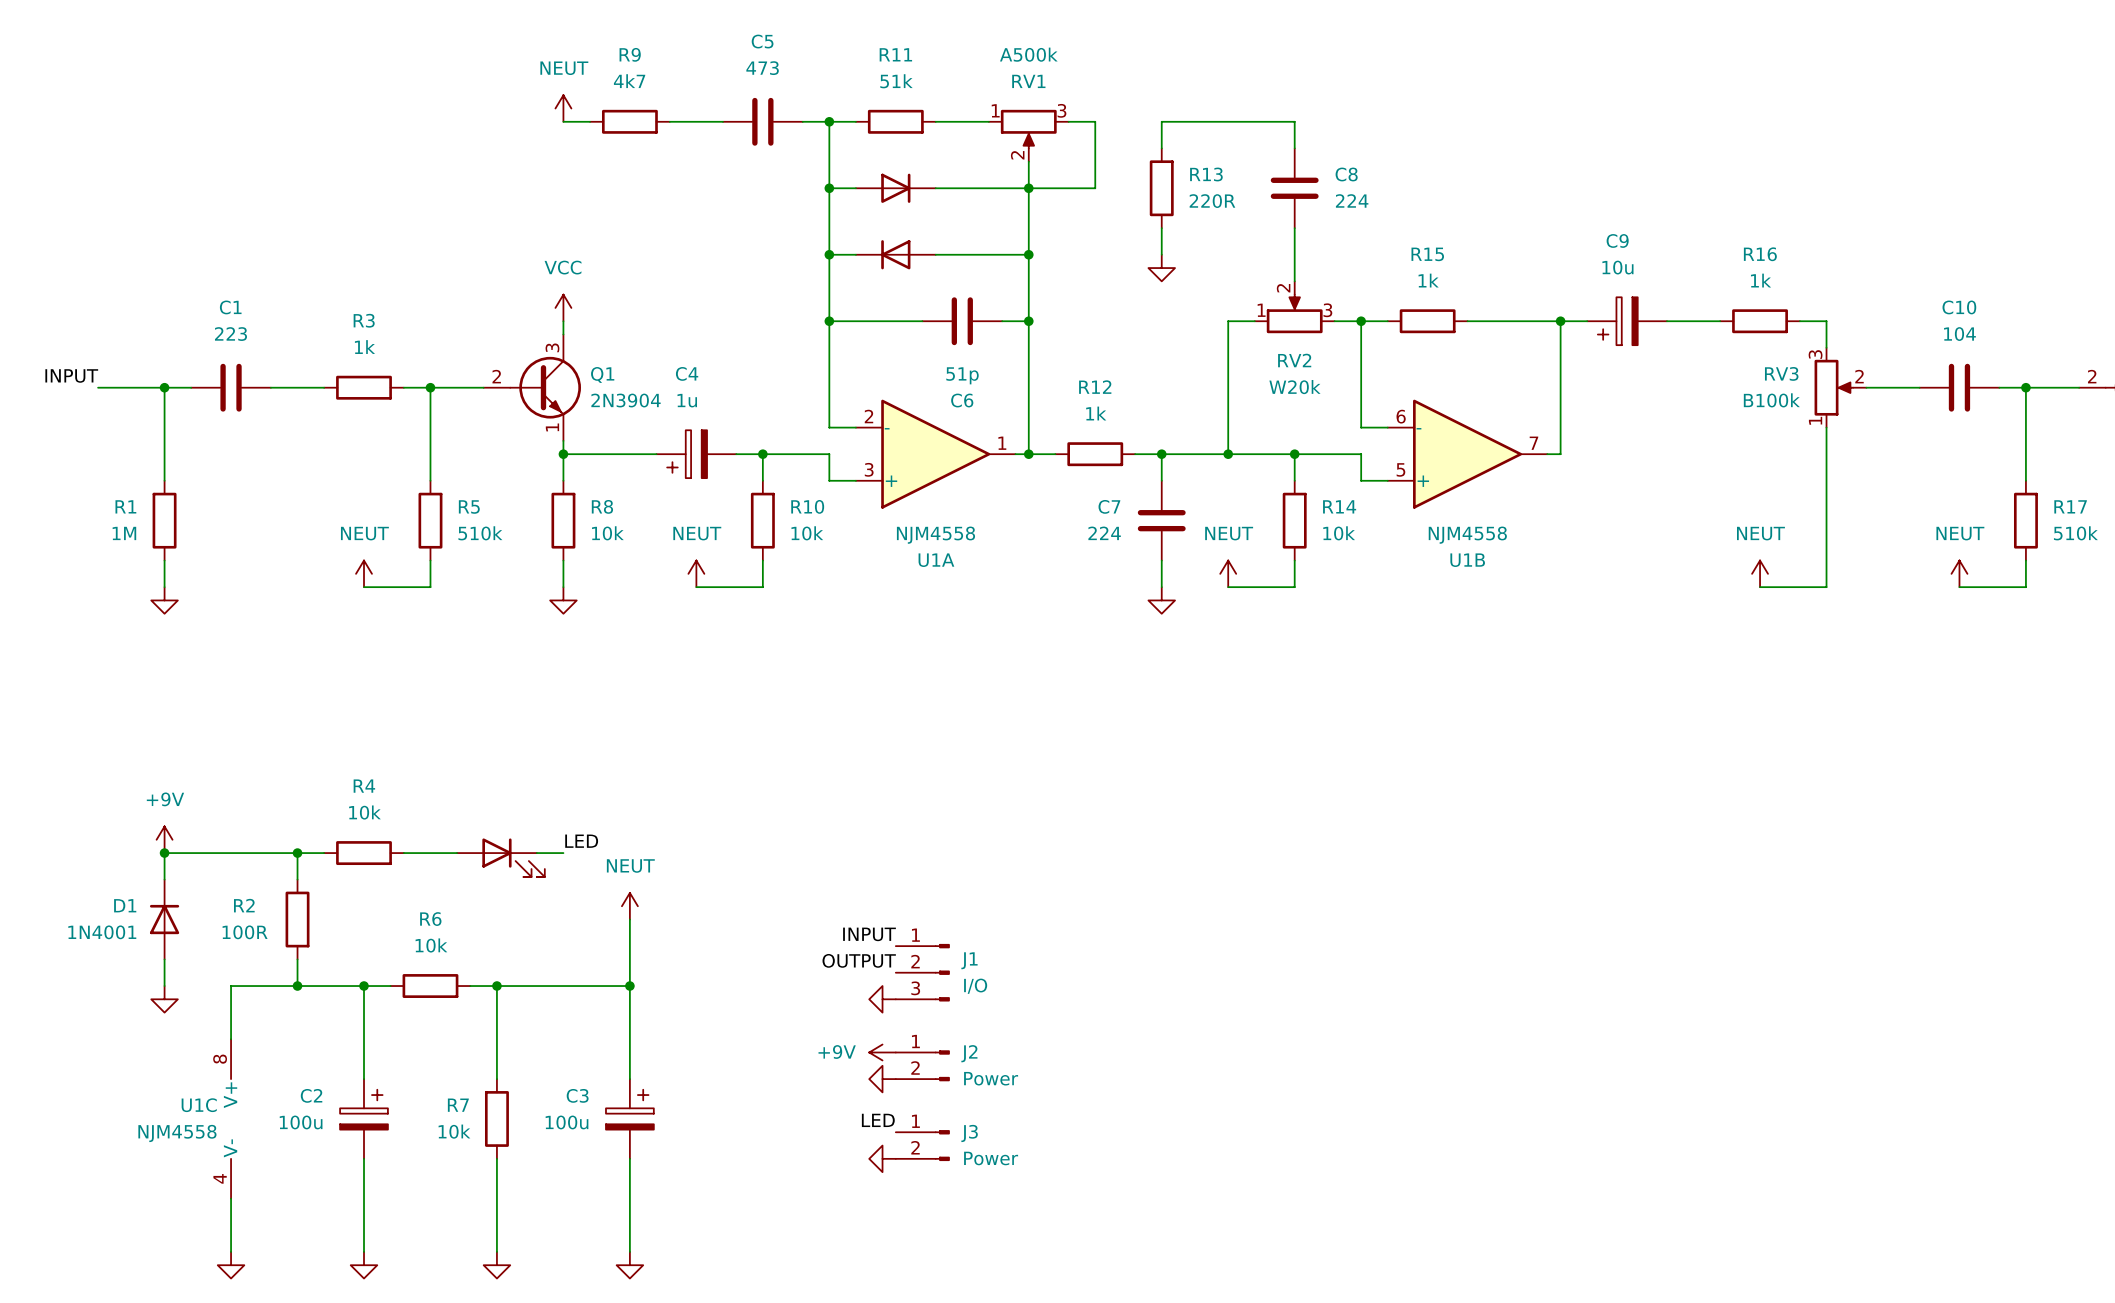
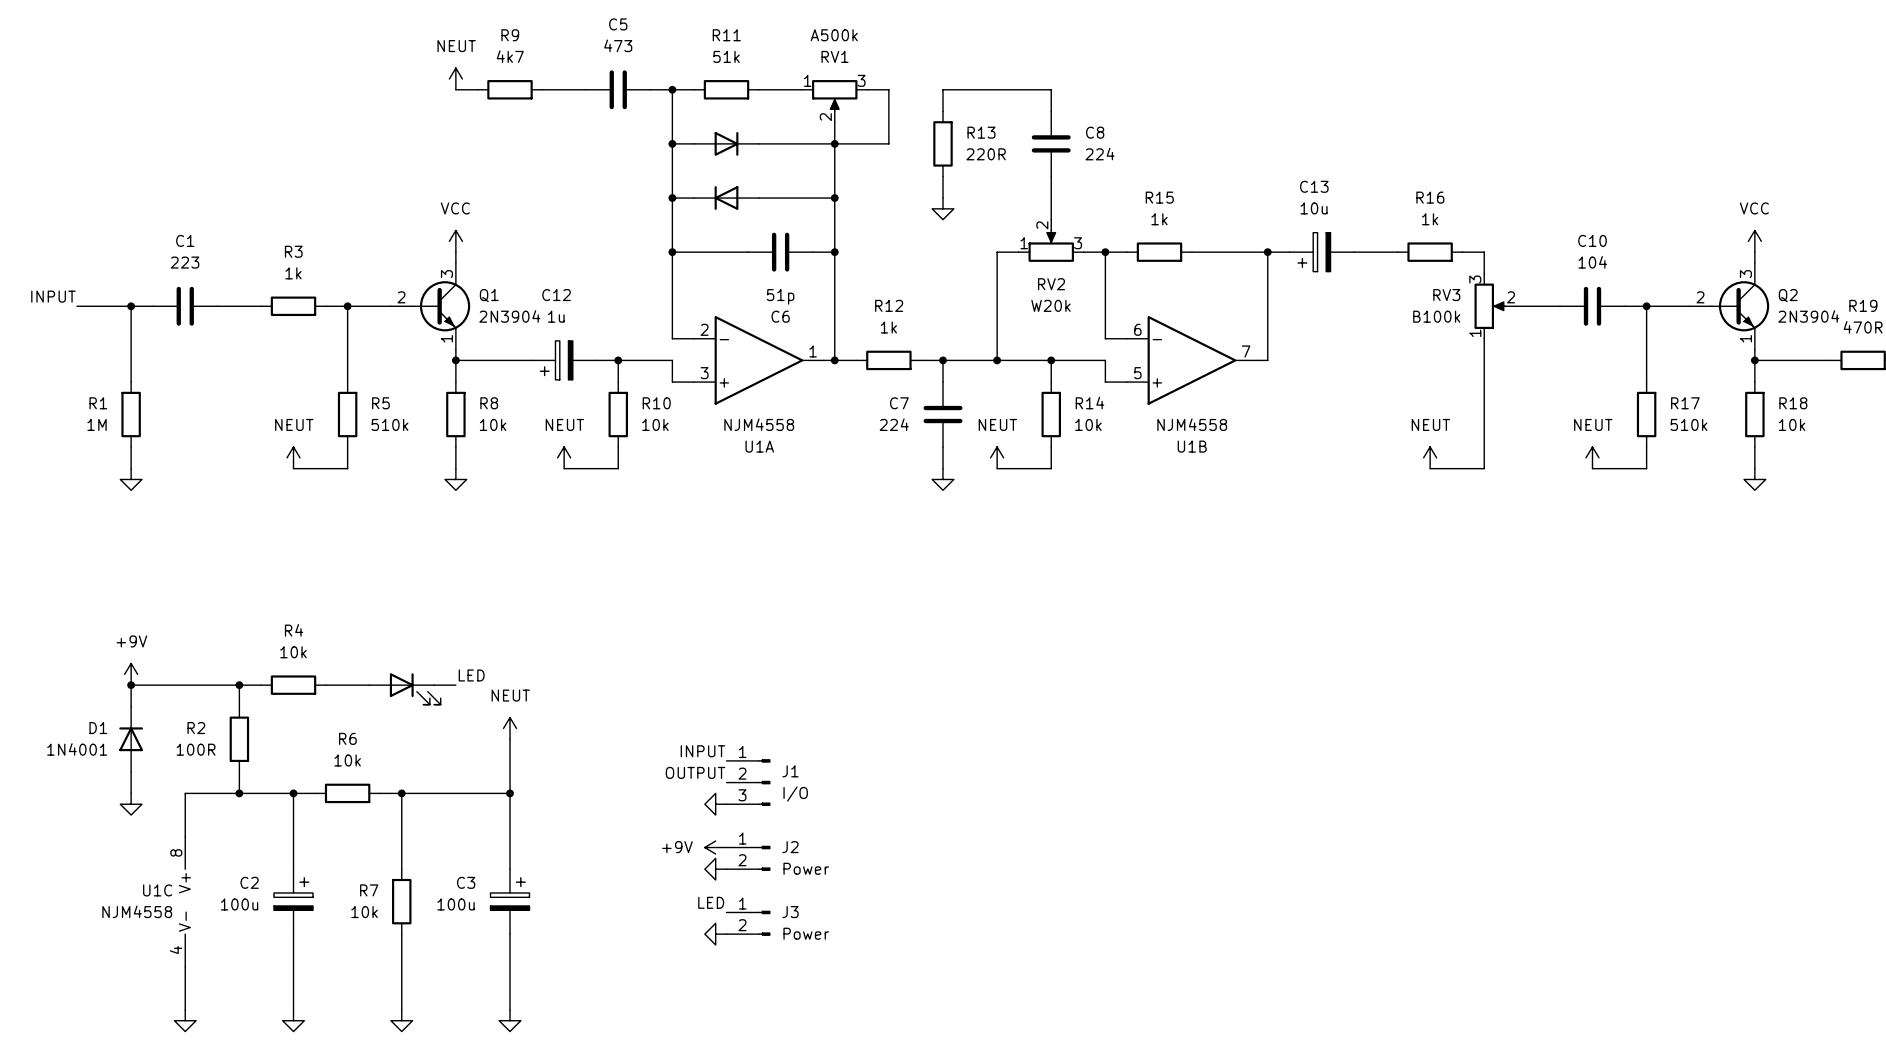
C9 name: C9 (1617, 240) -> C13 (1314, 186)
C4 name: C4 (687, 373) -> C12 (556, 295)

